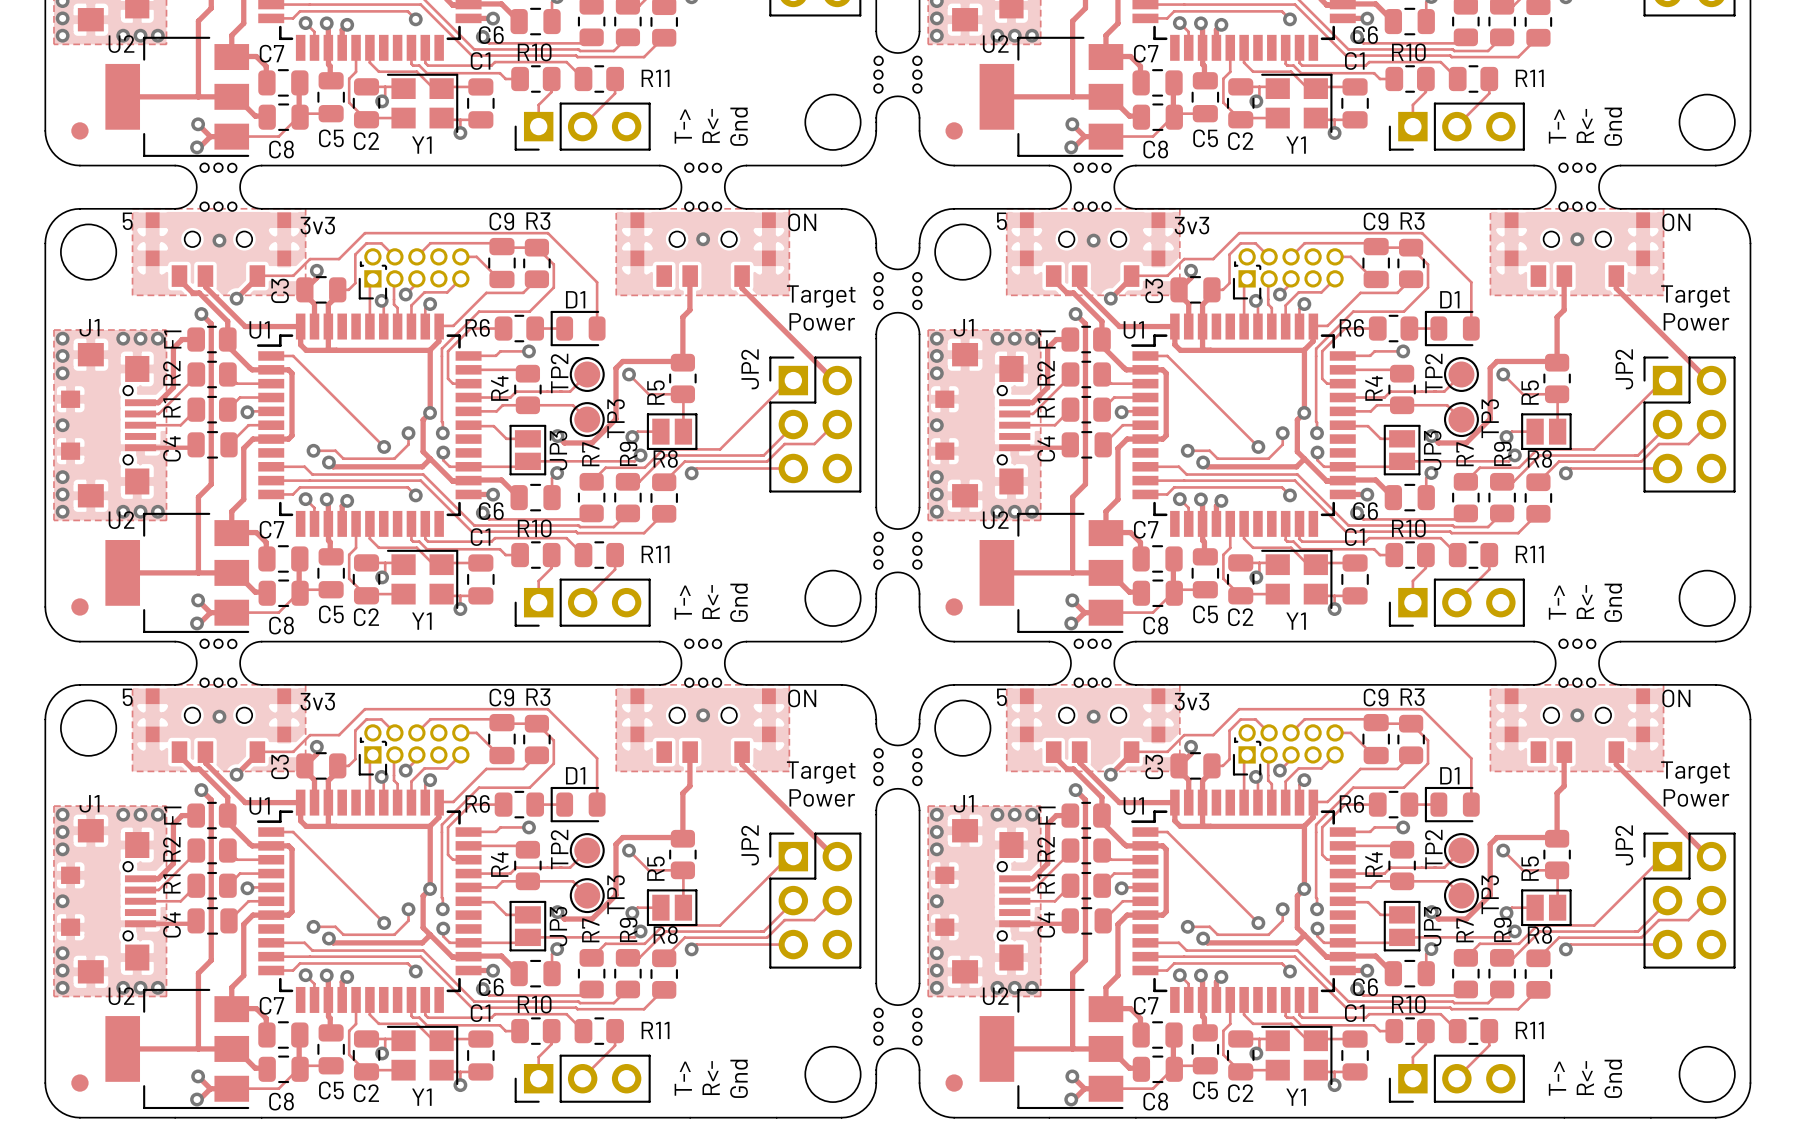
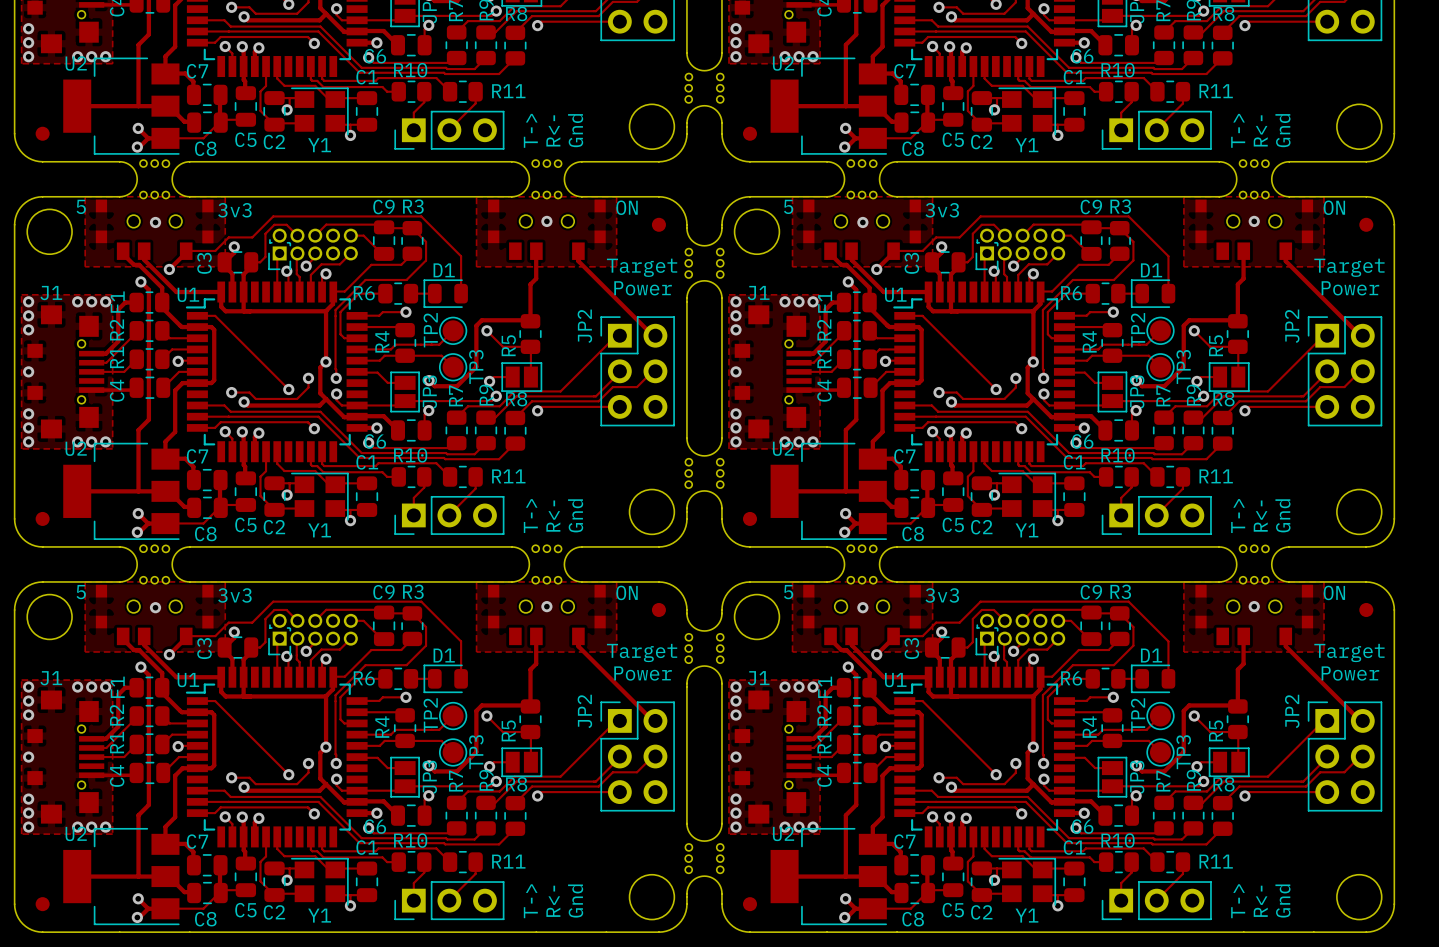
part: none -> (658, 224)
part: none -> (1366, 224)
part: none -> (658, 609)
part: none -> (1366, 609)

